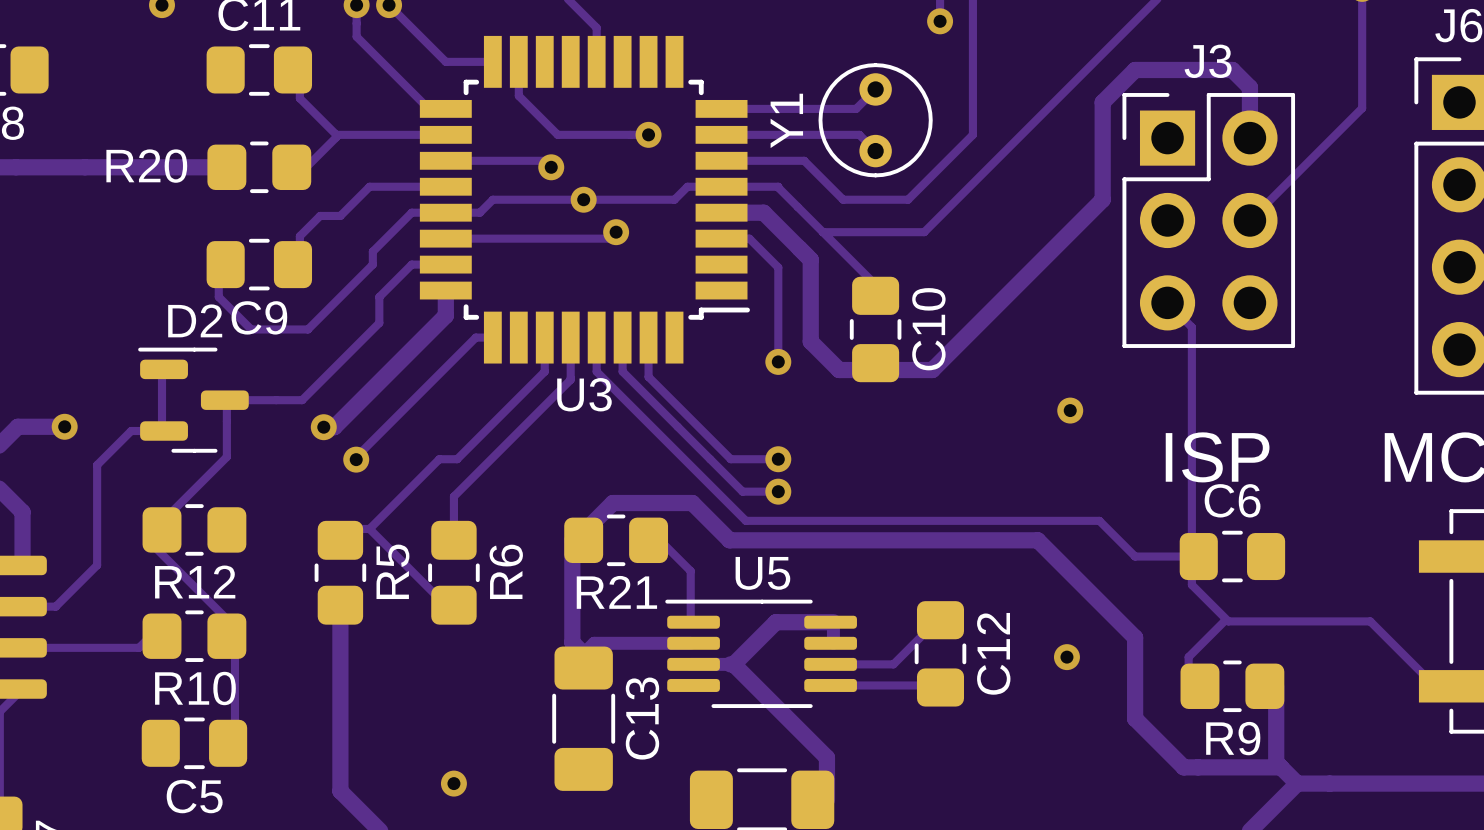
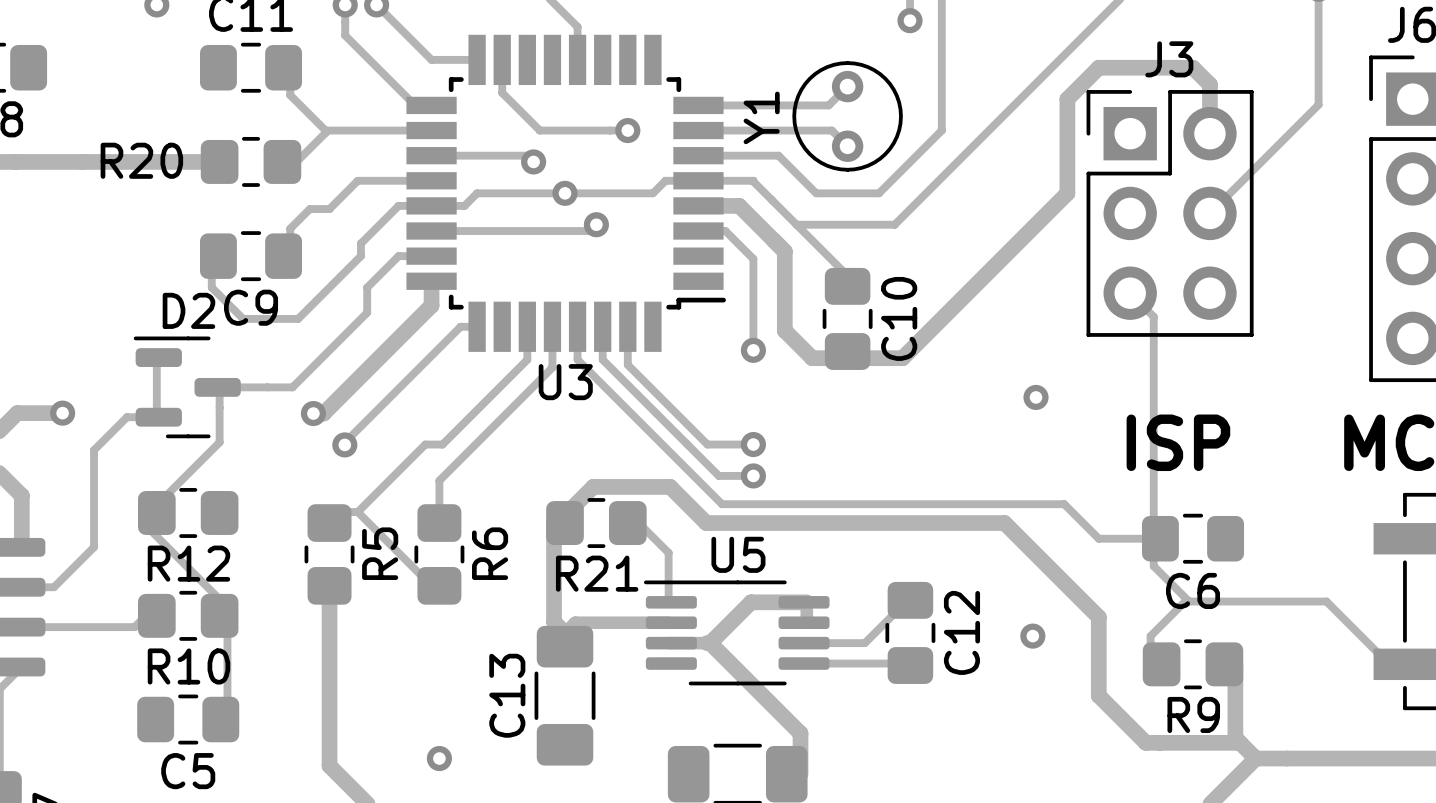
C6 name position: C6 (1232, 500) -> C6 (1193, 590)
C13 name position: C13 (642, 718) -> C13 (507, 695)

